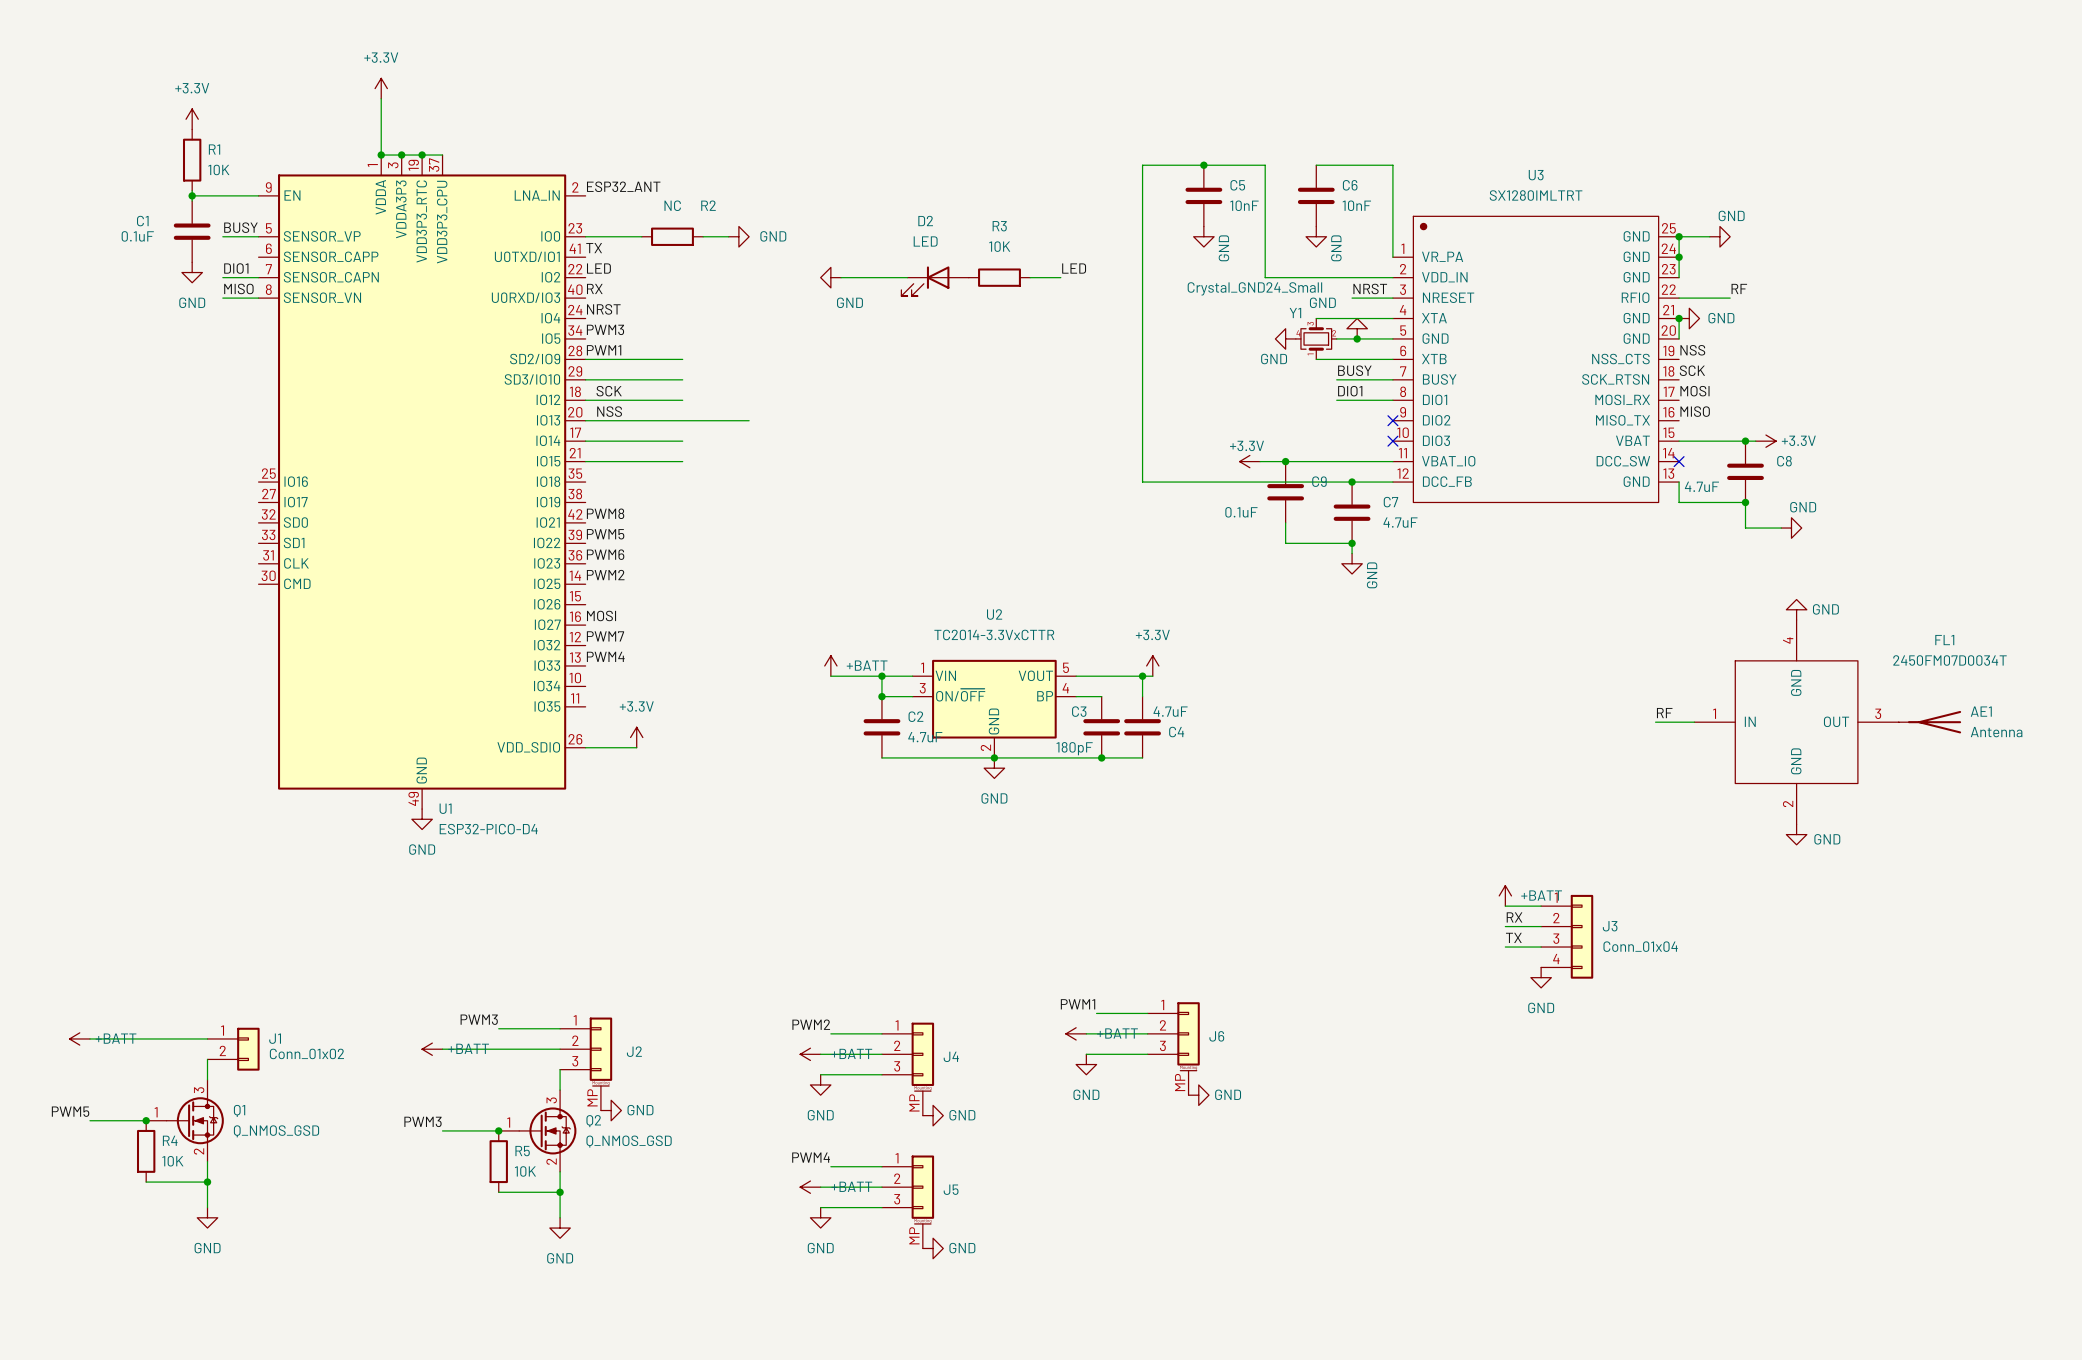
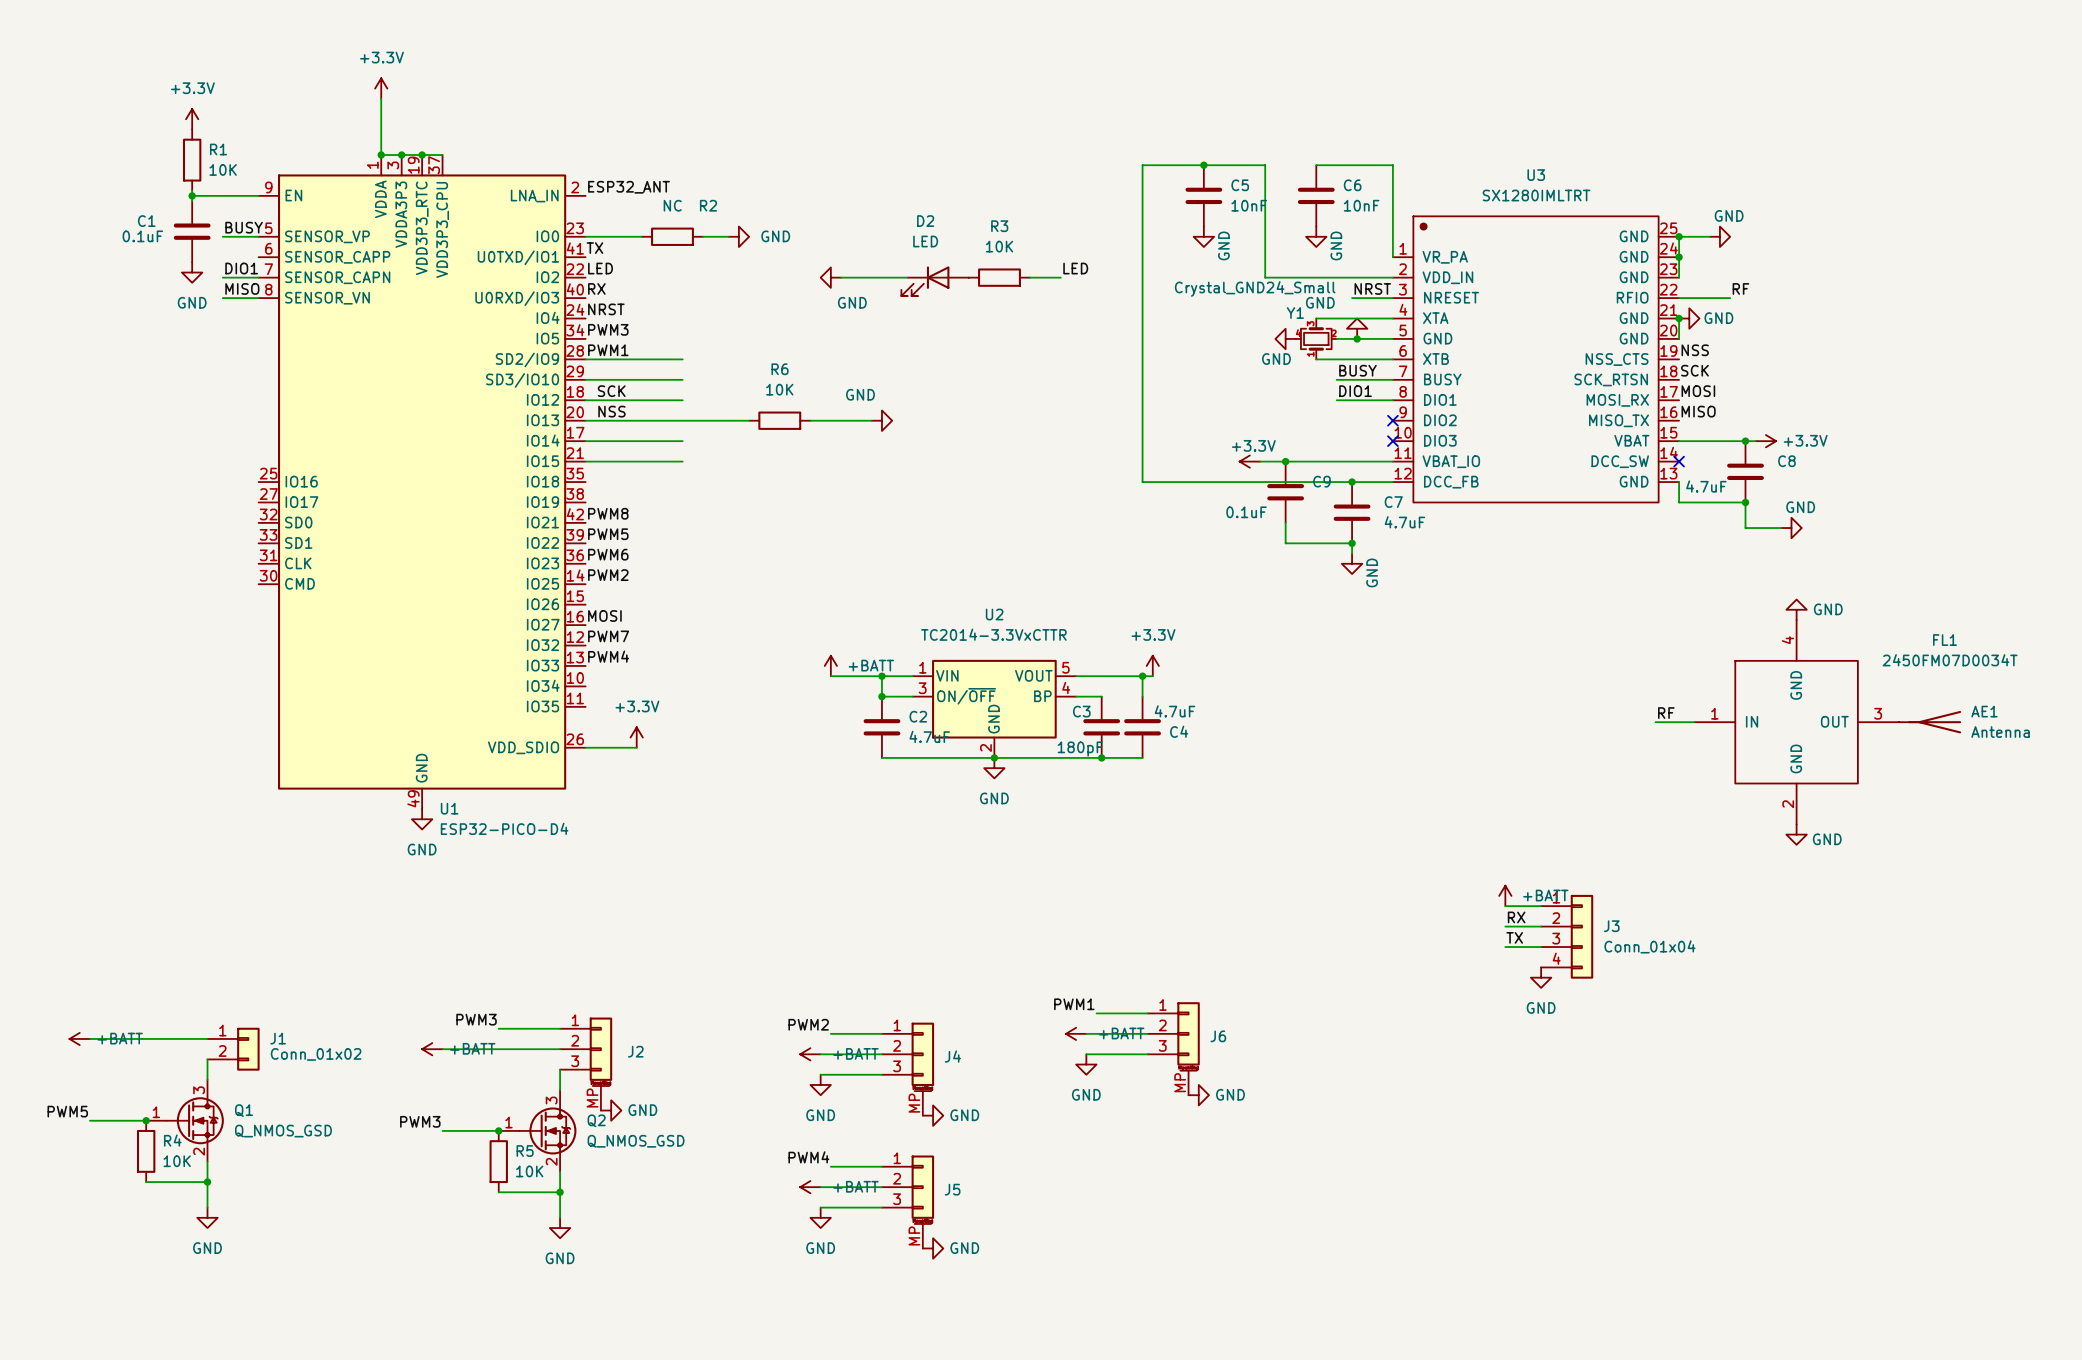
R6: none -> 10K (779, 420)
wire: none -> (810, 420) (871, 420)
power symbol: none -> GND (881, 420)

